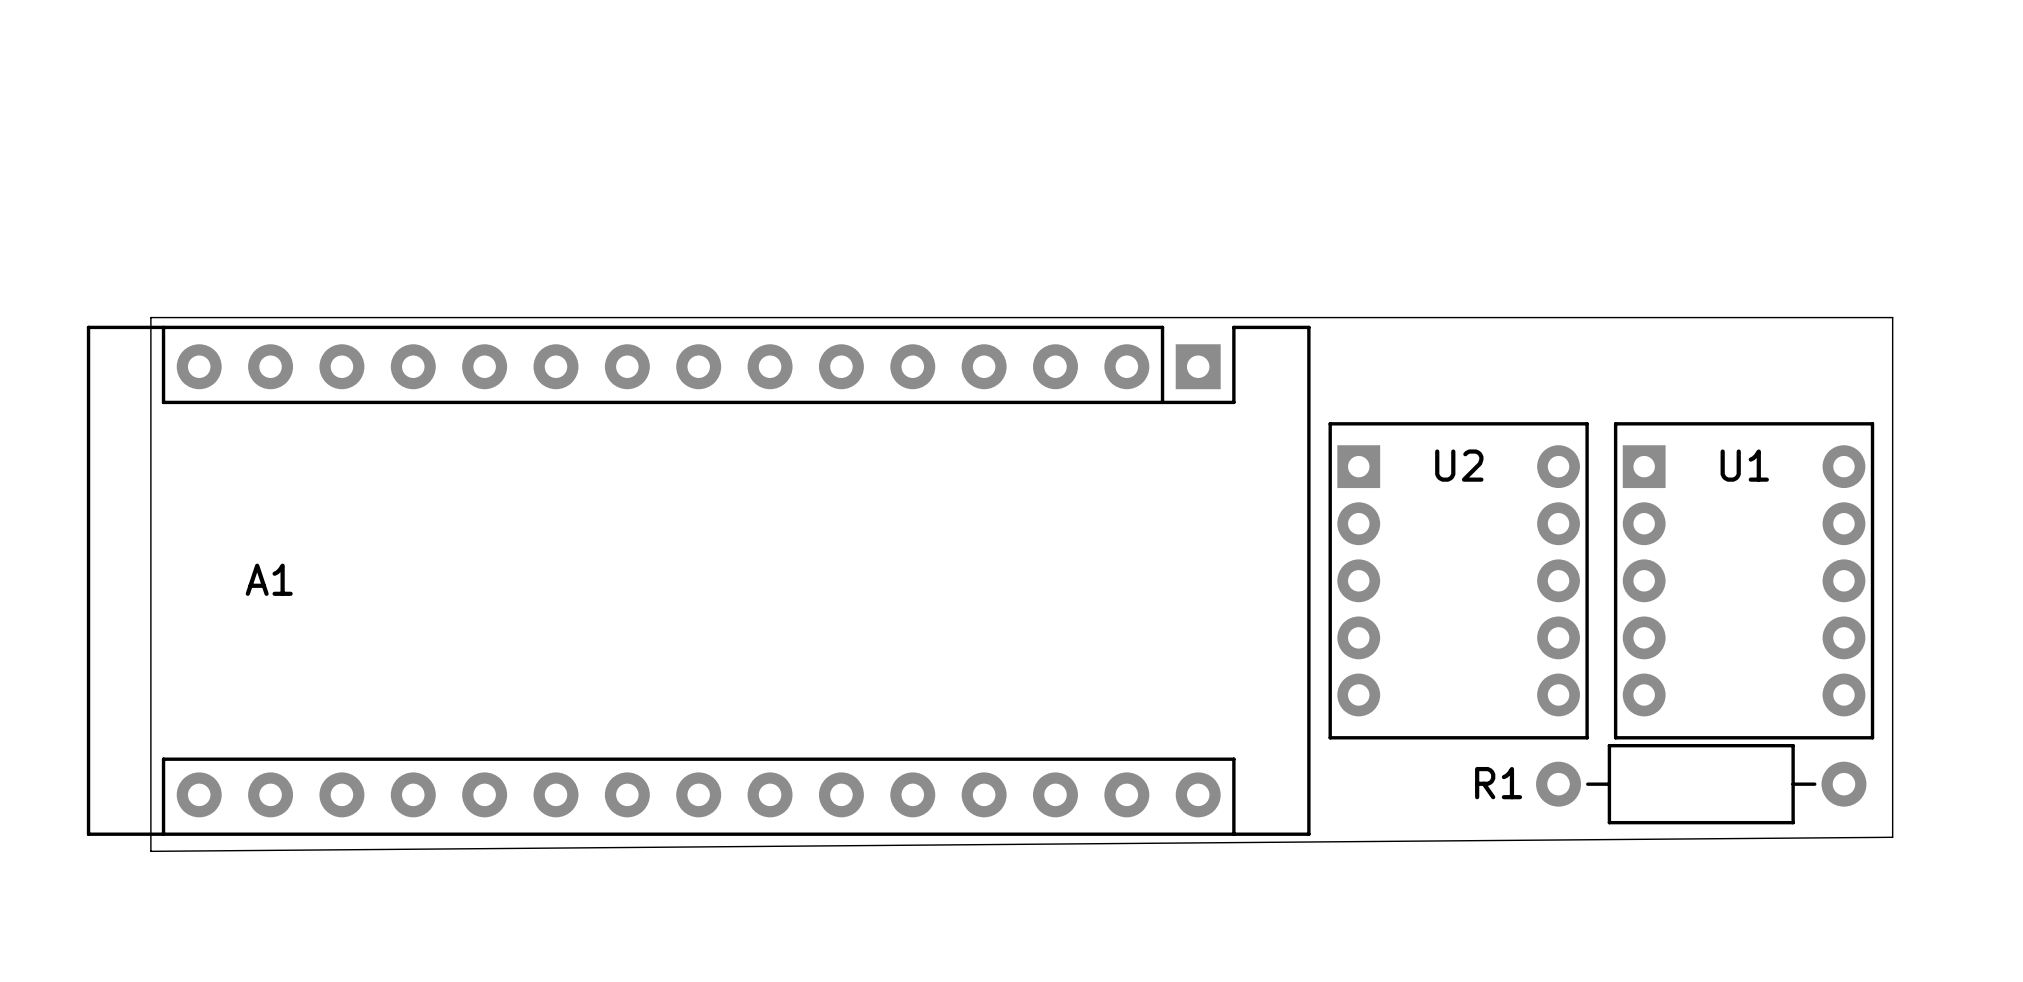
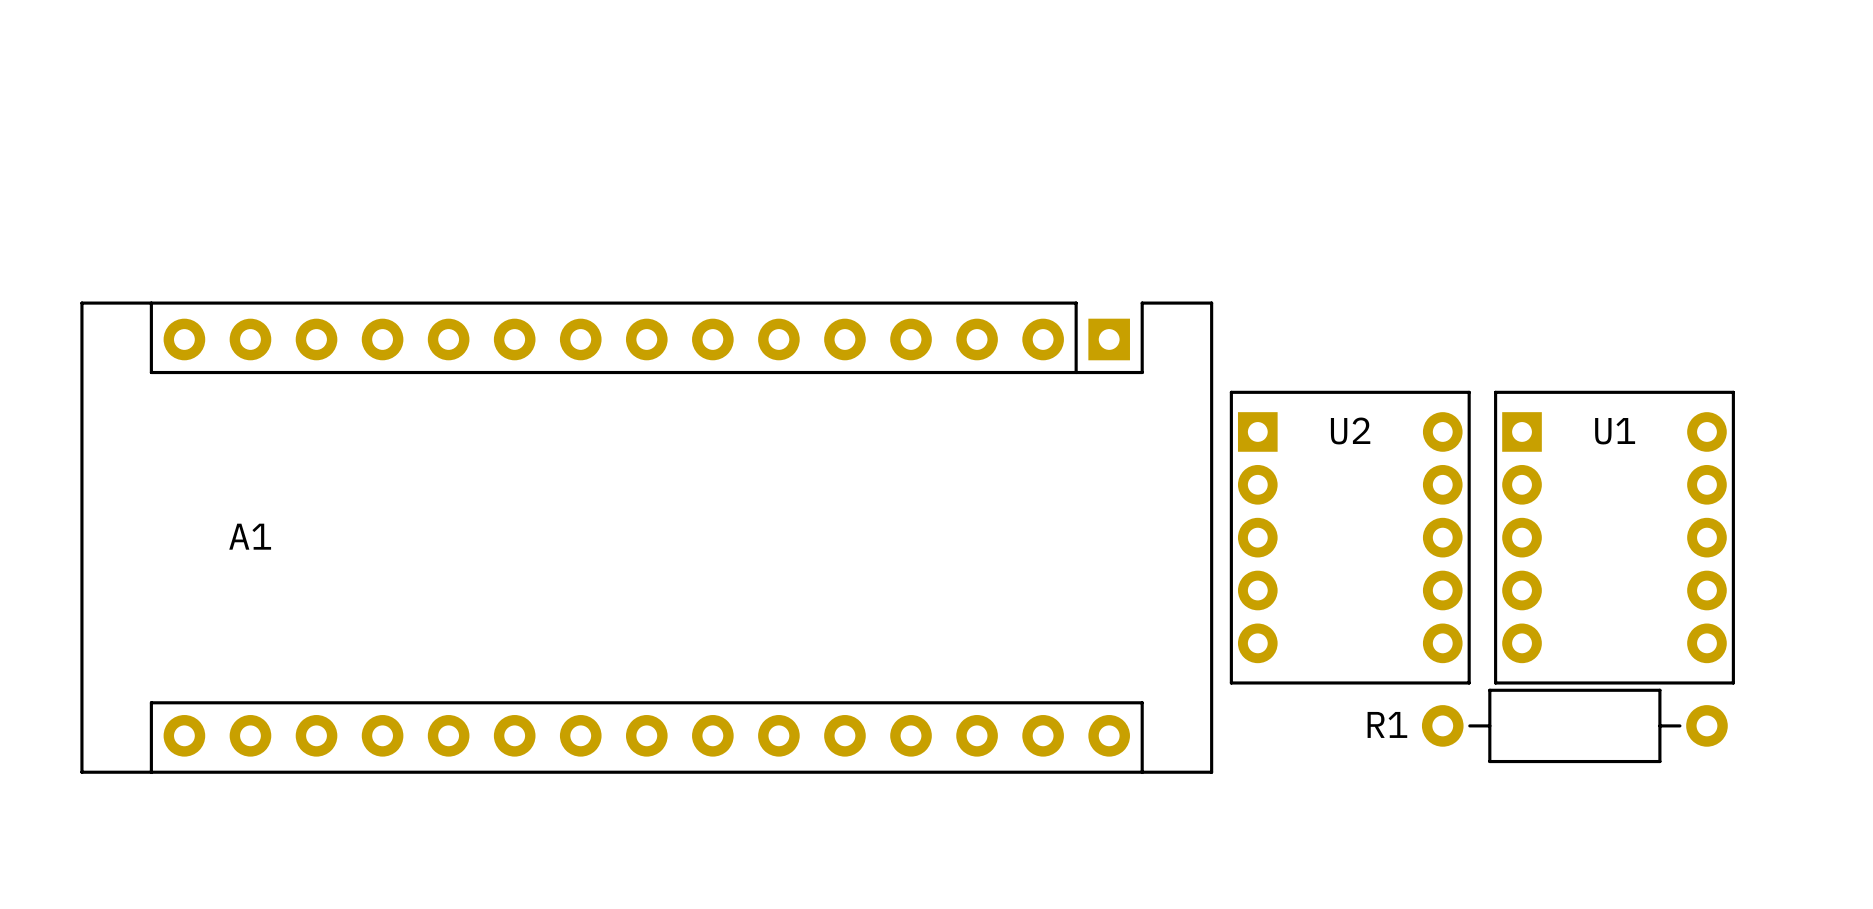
board edge: (150, 317) (1892, 317) (1892, 837) (150, 851) (150, 317) -> none

